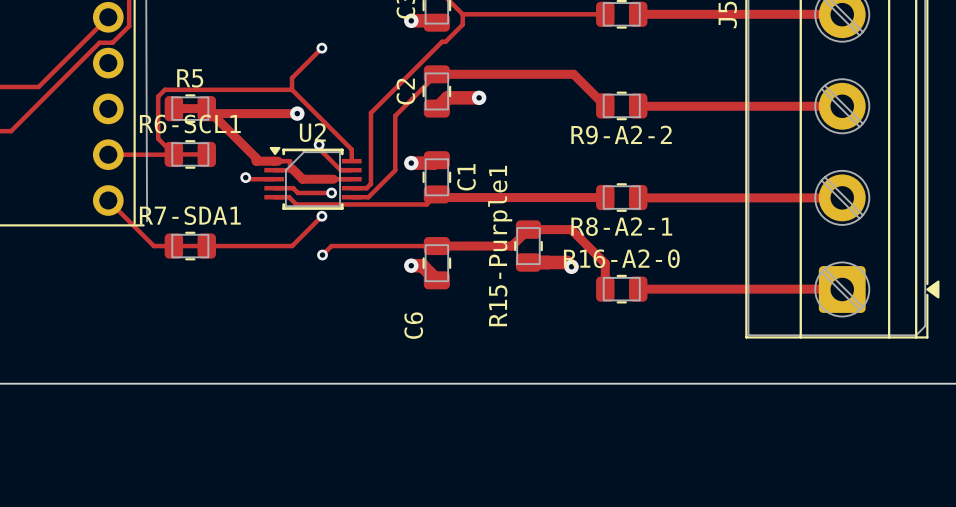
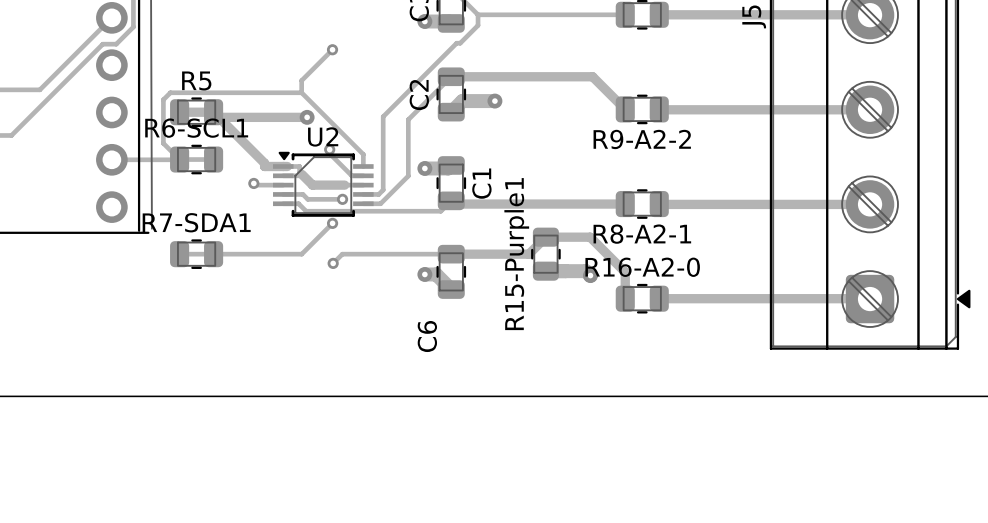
track: (108, 200) (153, 246) (173, 246) -> none

